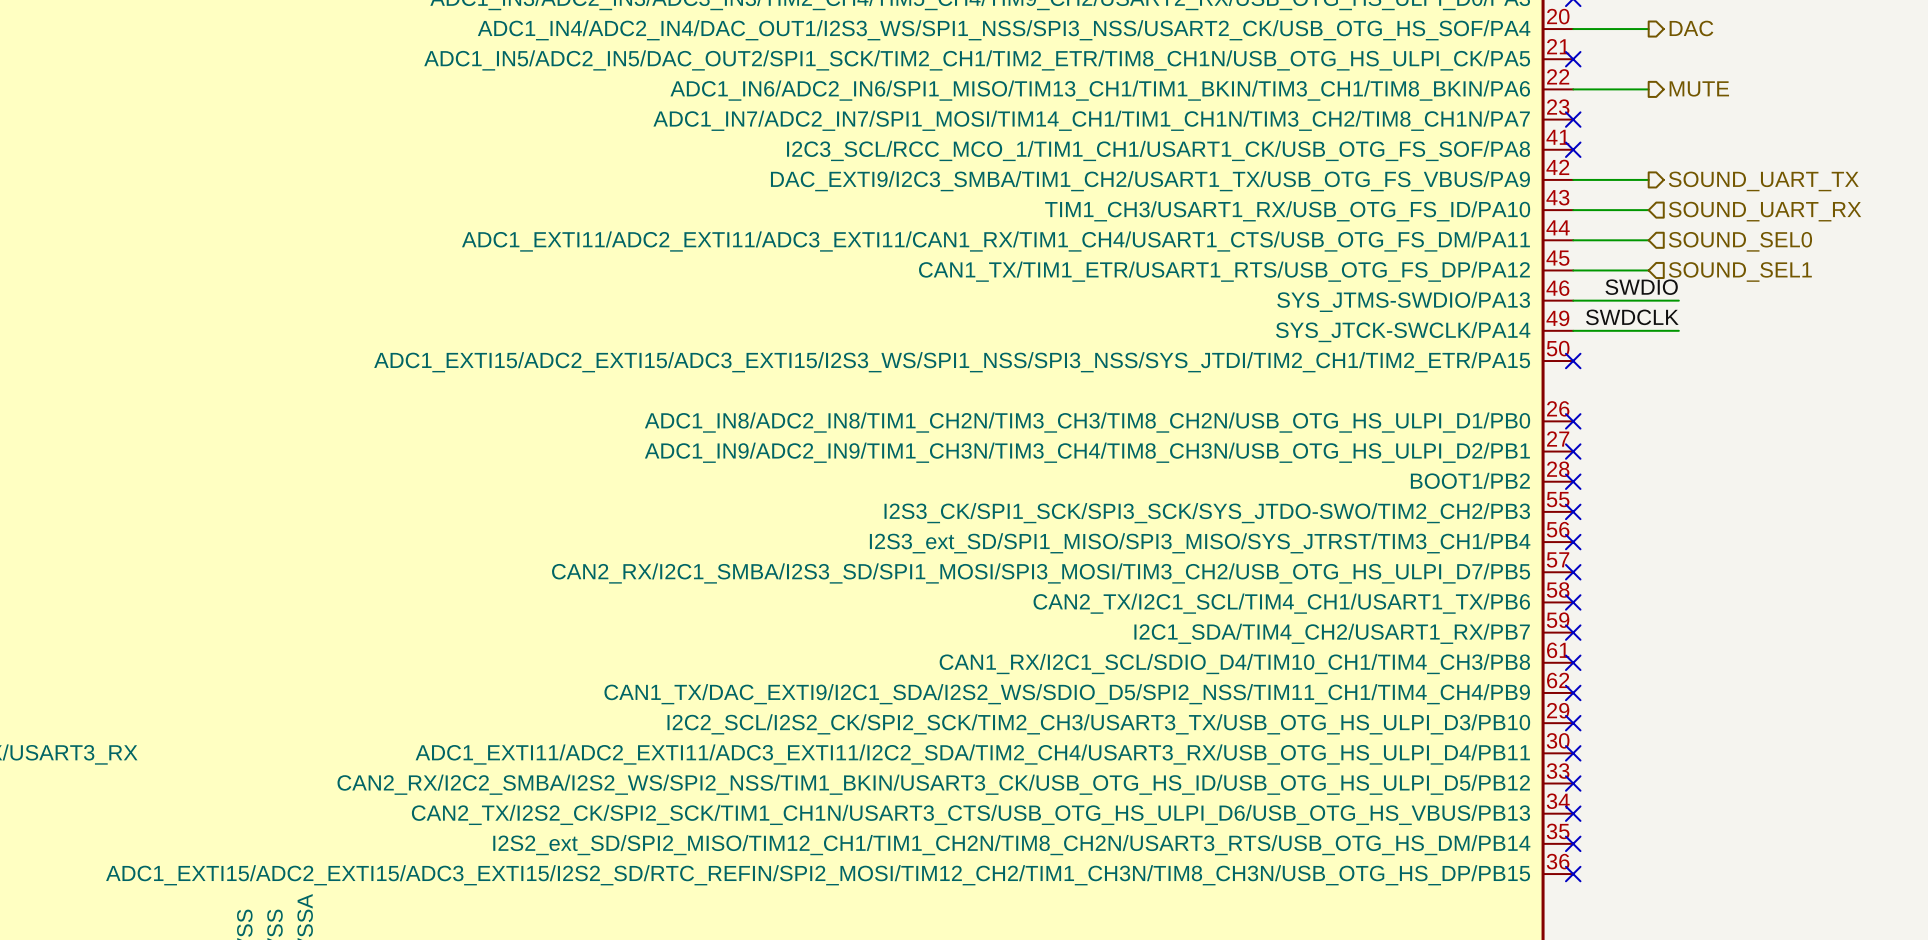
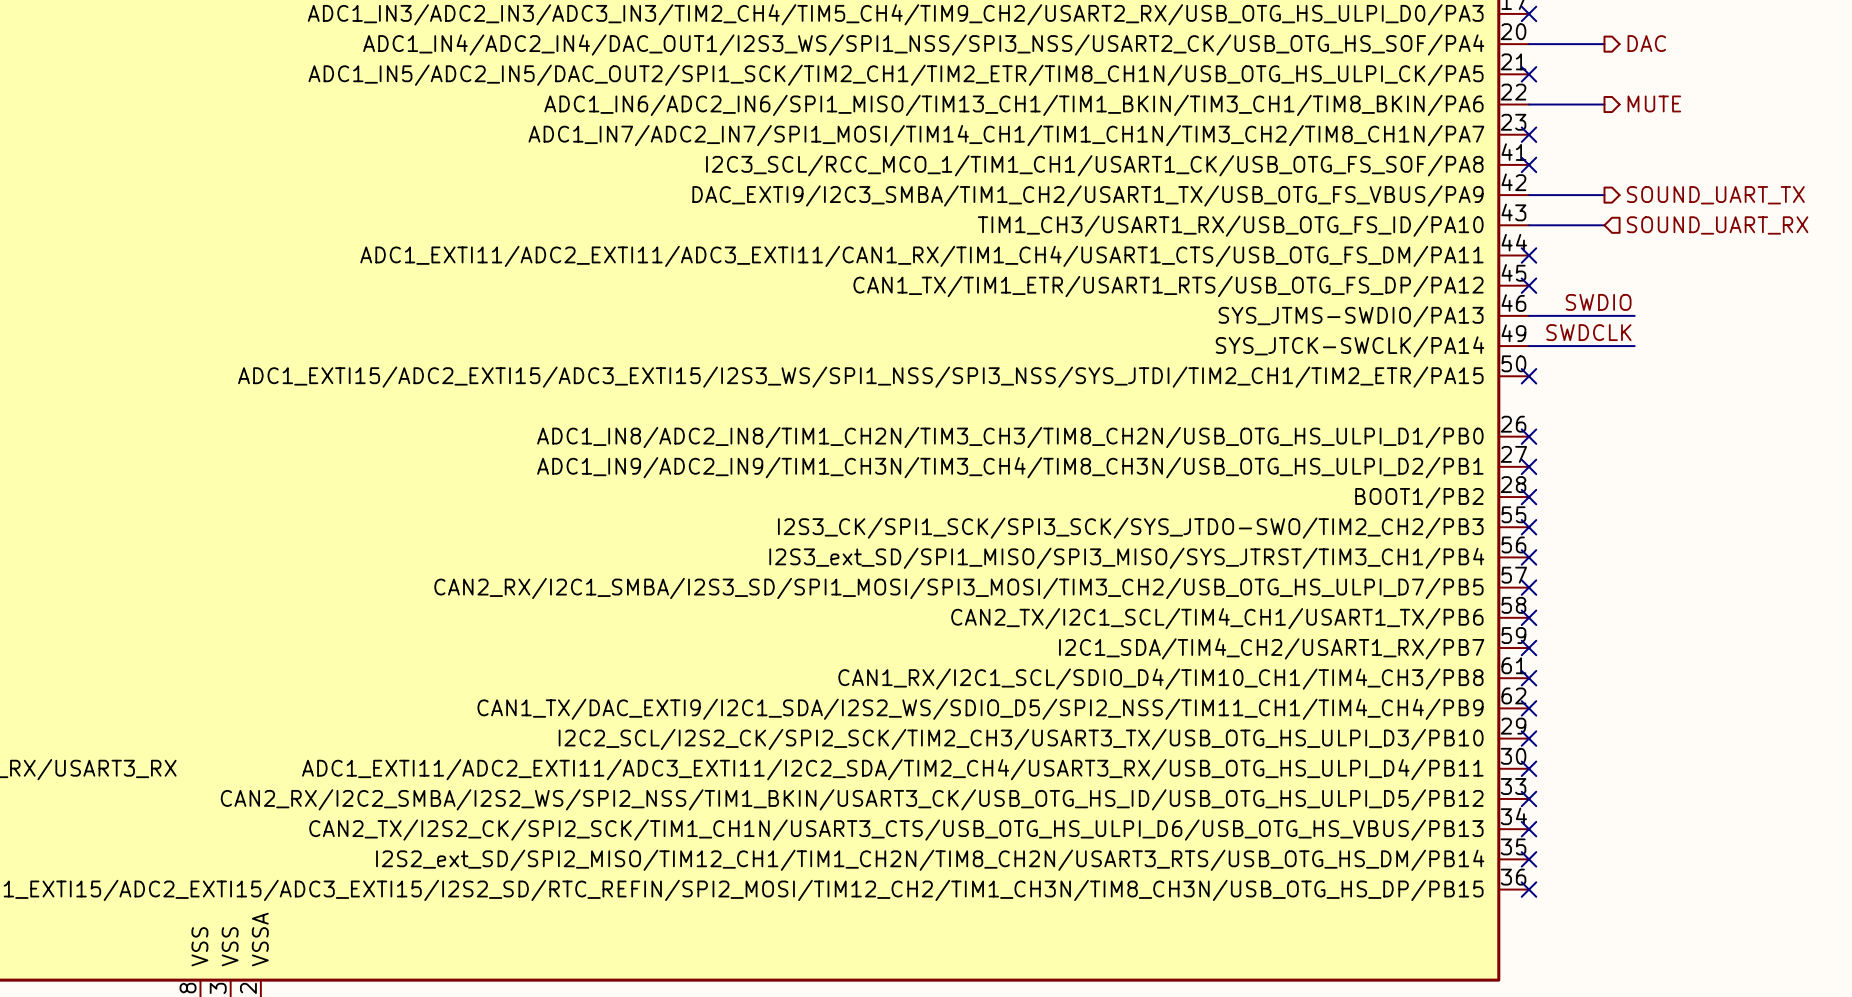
wire: (1573, 240) (1648, 240) -> none
no-connect mark: none -> (1529, 255)
hierarchical label: SOUND_SEL0 (1740, 241) -> none
wire: (1573, 270) (1648, 270) -> none
no-connect mark: none -> (1529, 285)
hierarchical label: SOUND_SEL1 (1740, 271) -> none

